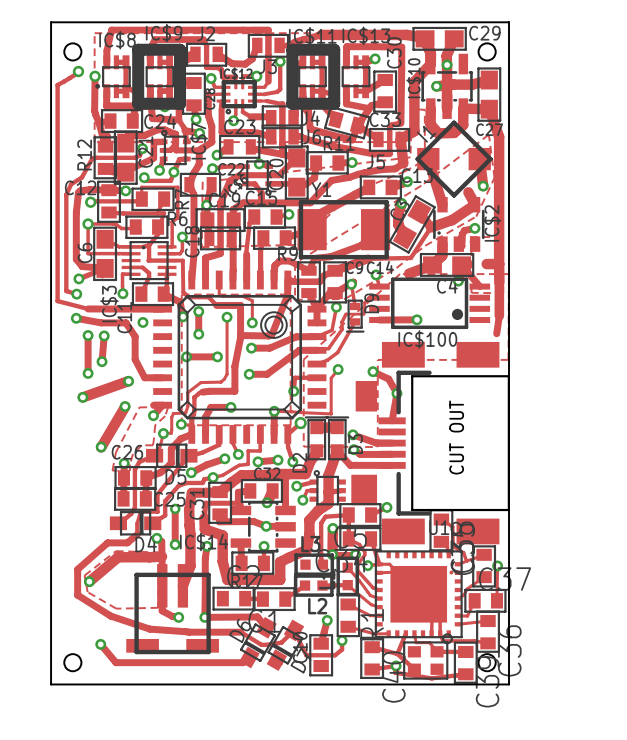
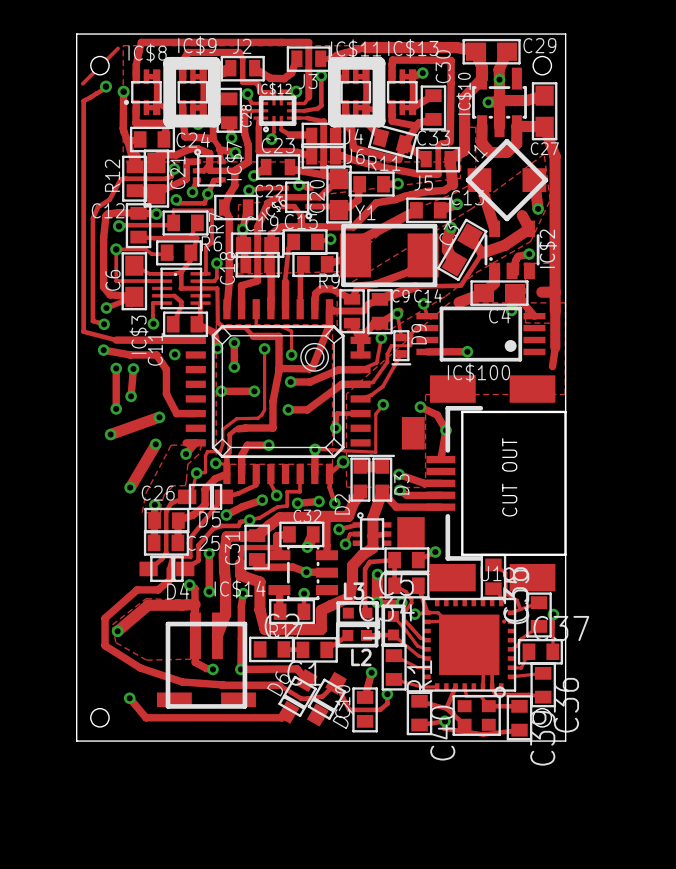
track: none -> (118, 48) (82, 83)

